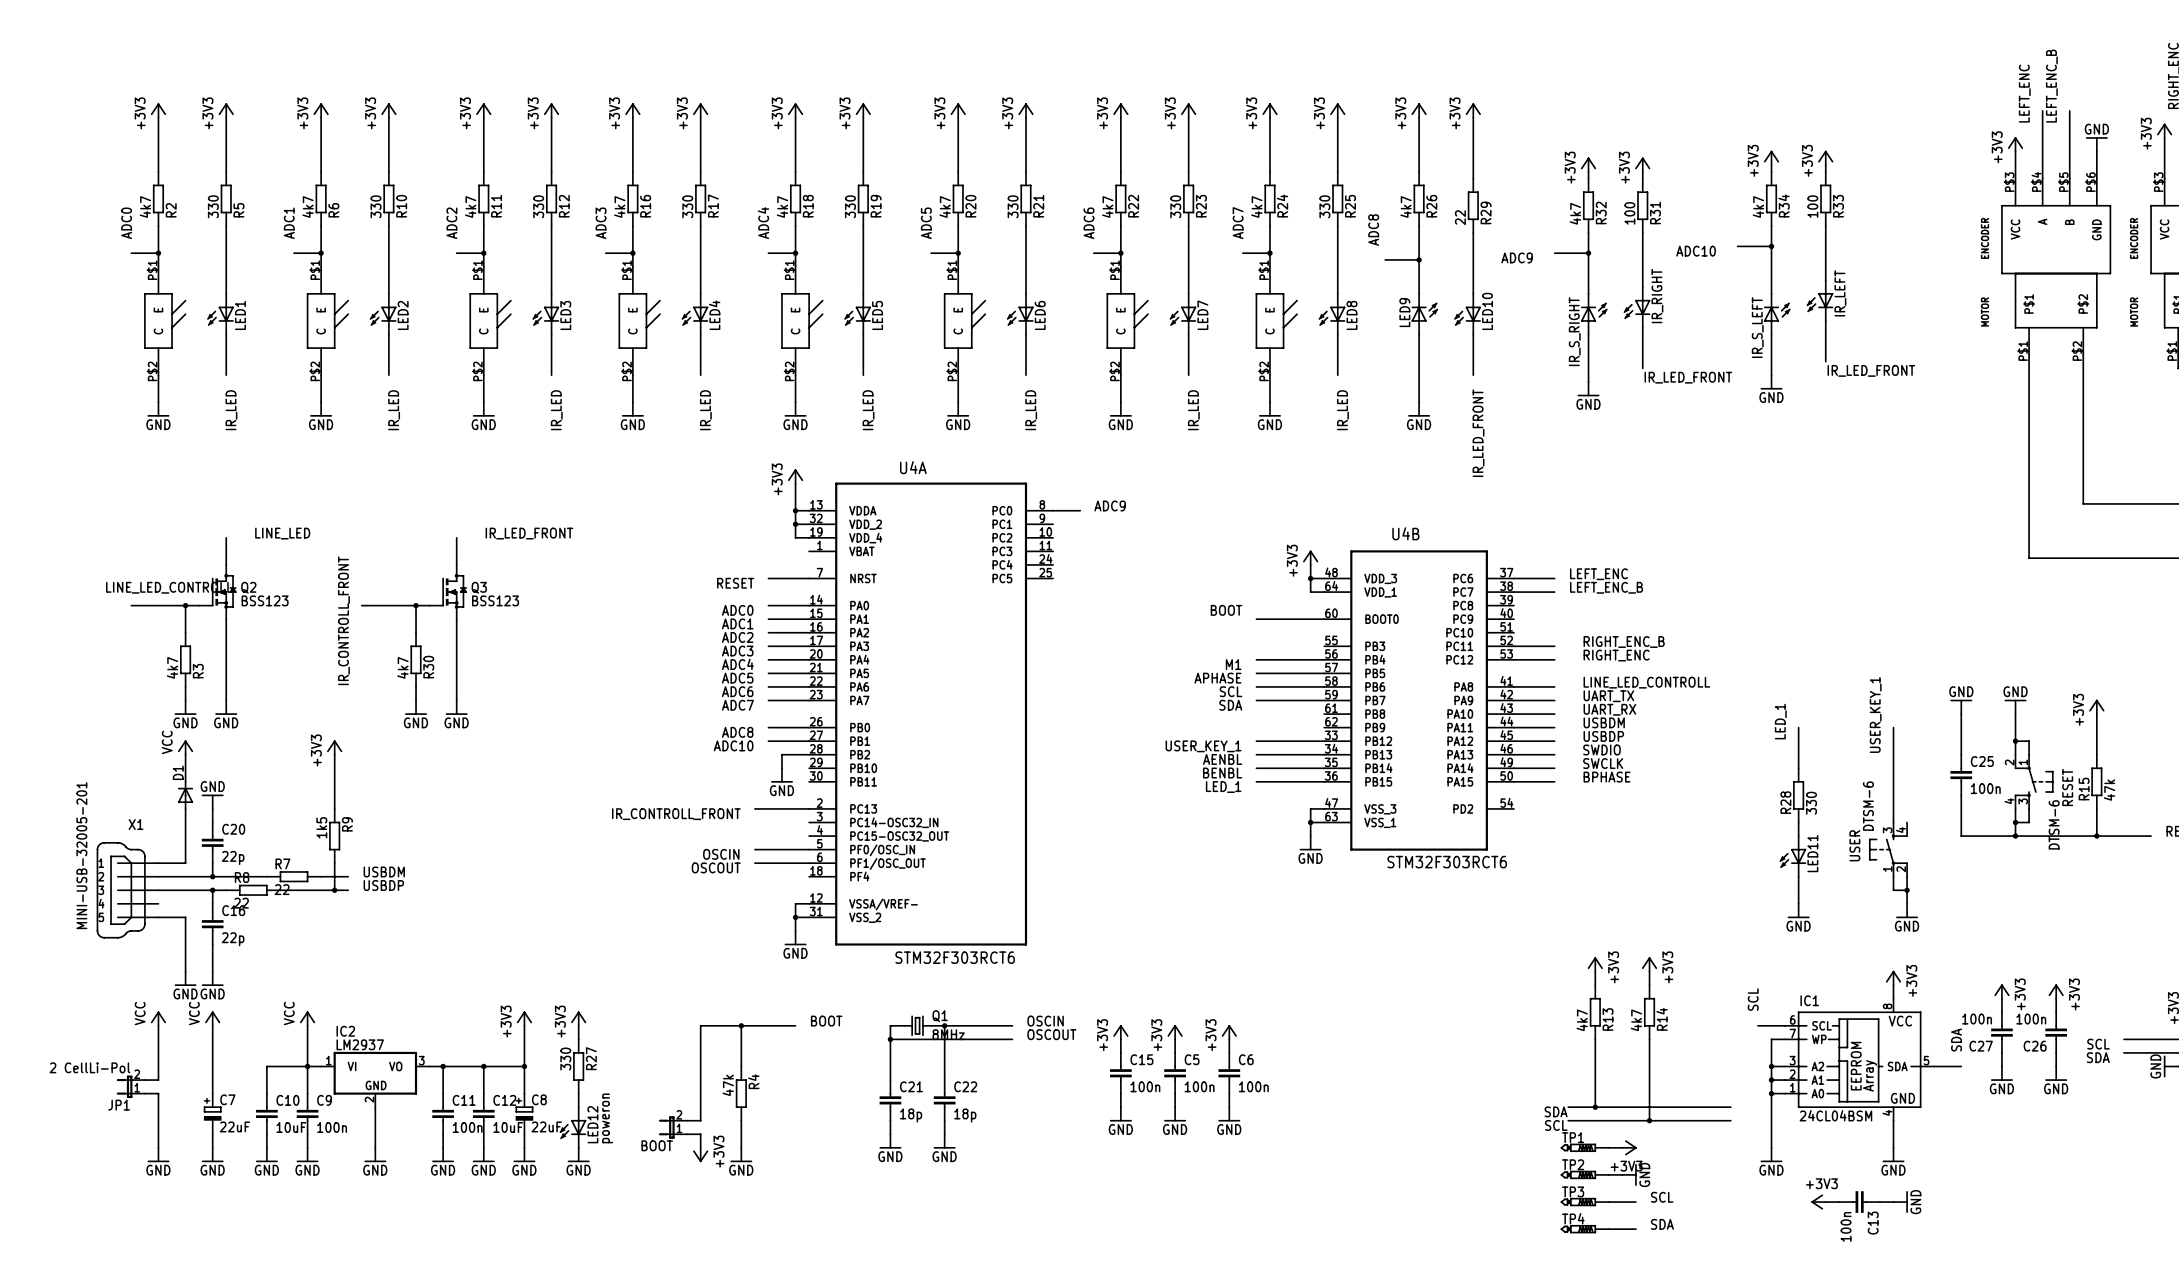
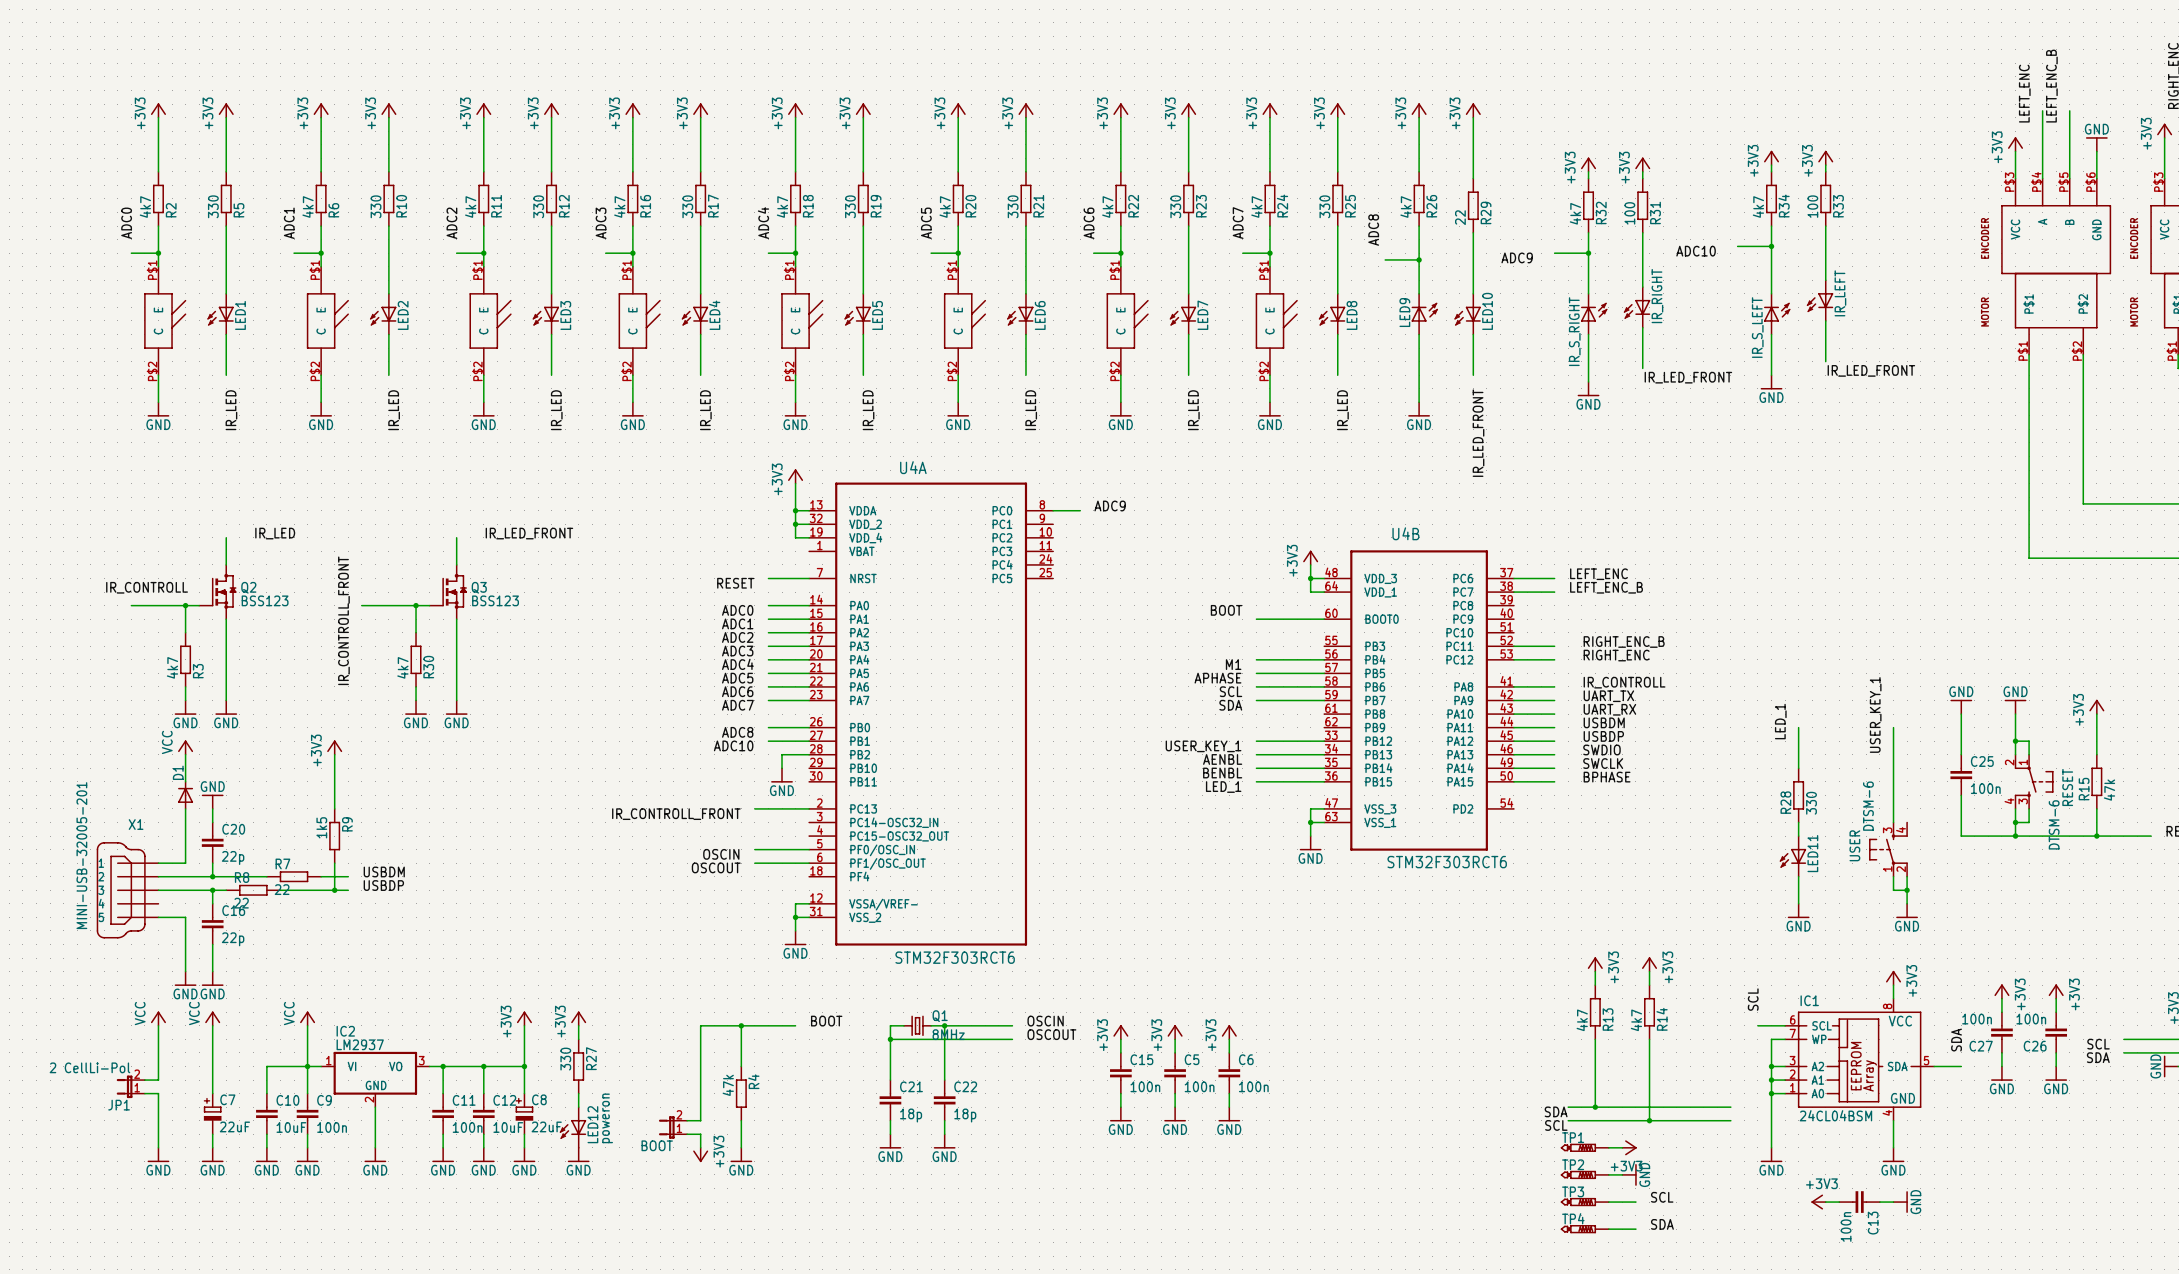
label: LINE_LED (282, 533) -> IR_LED (275, 533)
label: LINE_LED_CONTROLL (169, 587) -> IR_CONTROLL (147, 587)
label: LINE_LED_CONTROLL (1646, 682) -> IR_CONTROLL (1624, 682)

